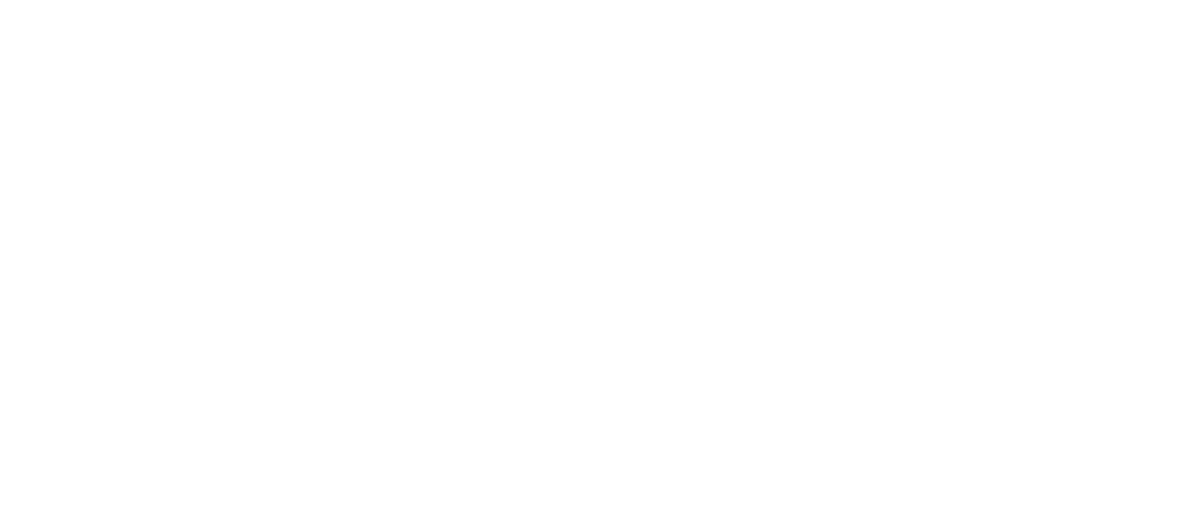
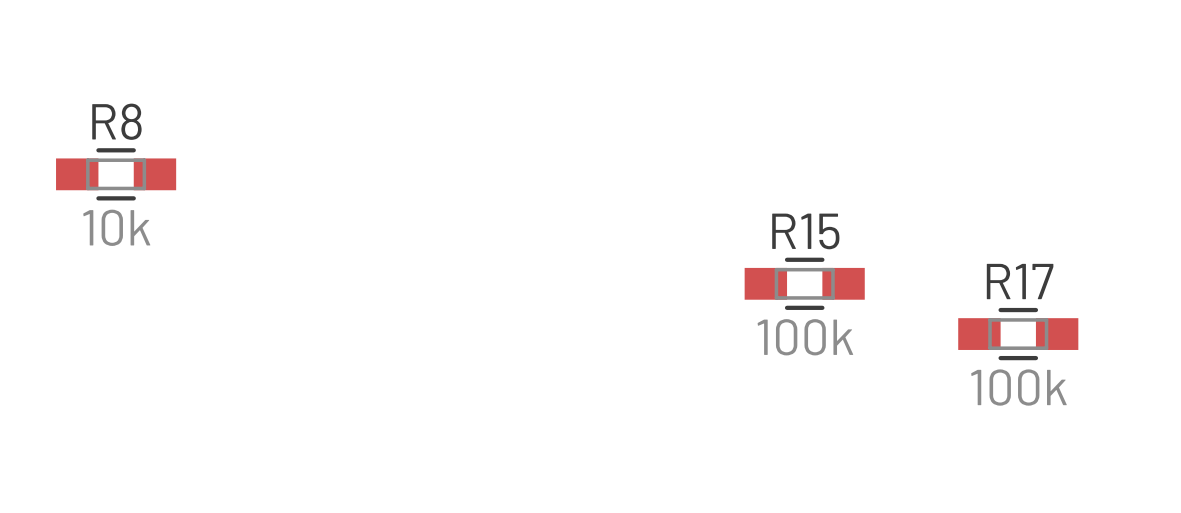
R8: none -> 10k (116, 174)
R15: none -> 100k (804, 283)
R17: none -> 100k (1018, 334)

